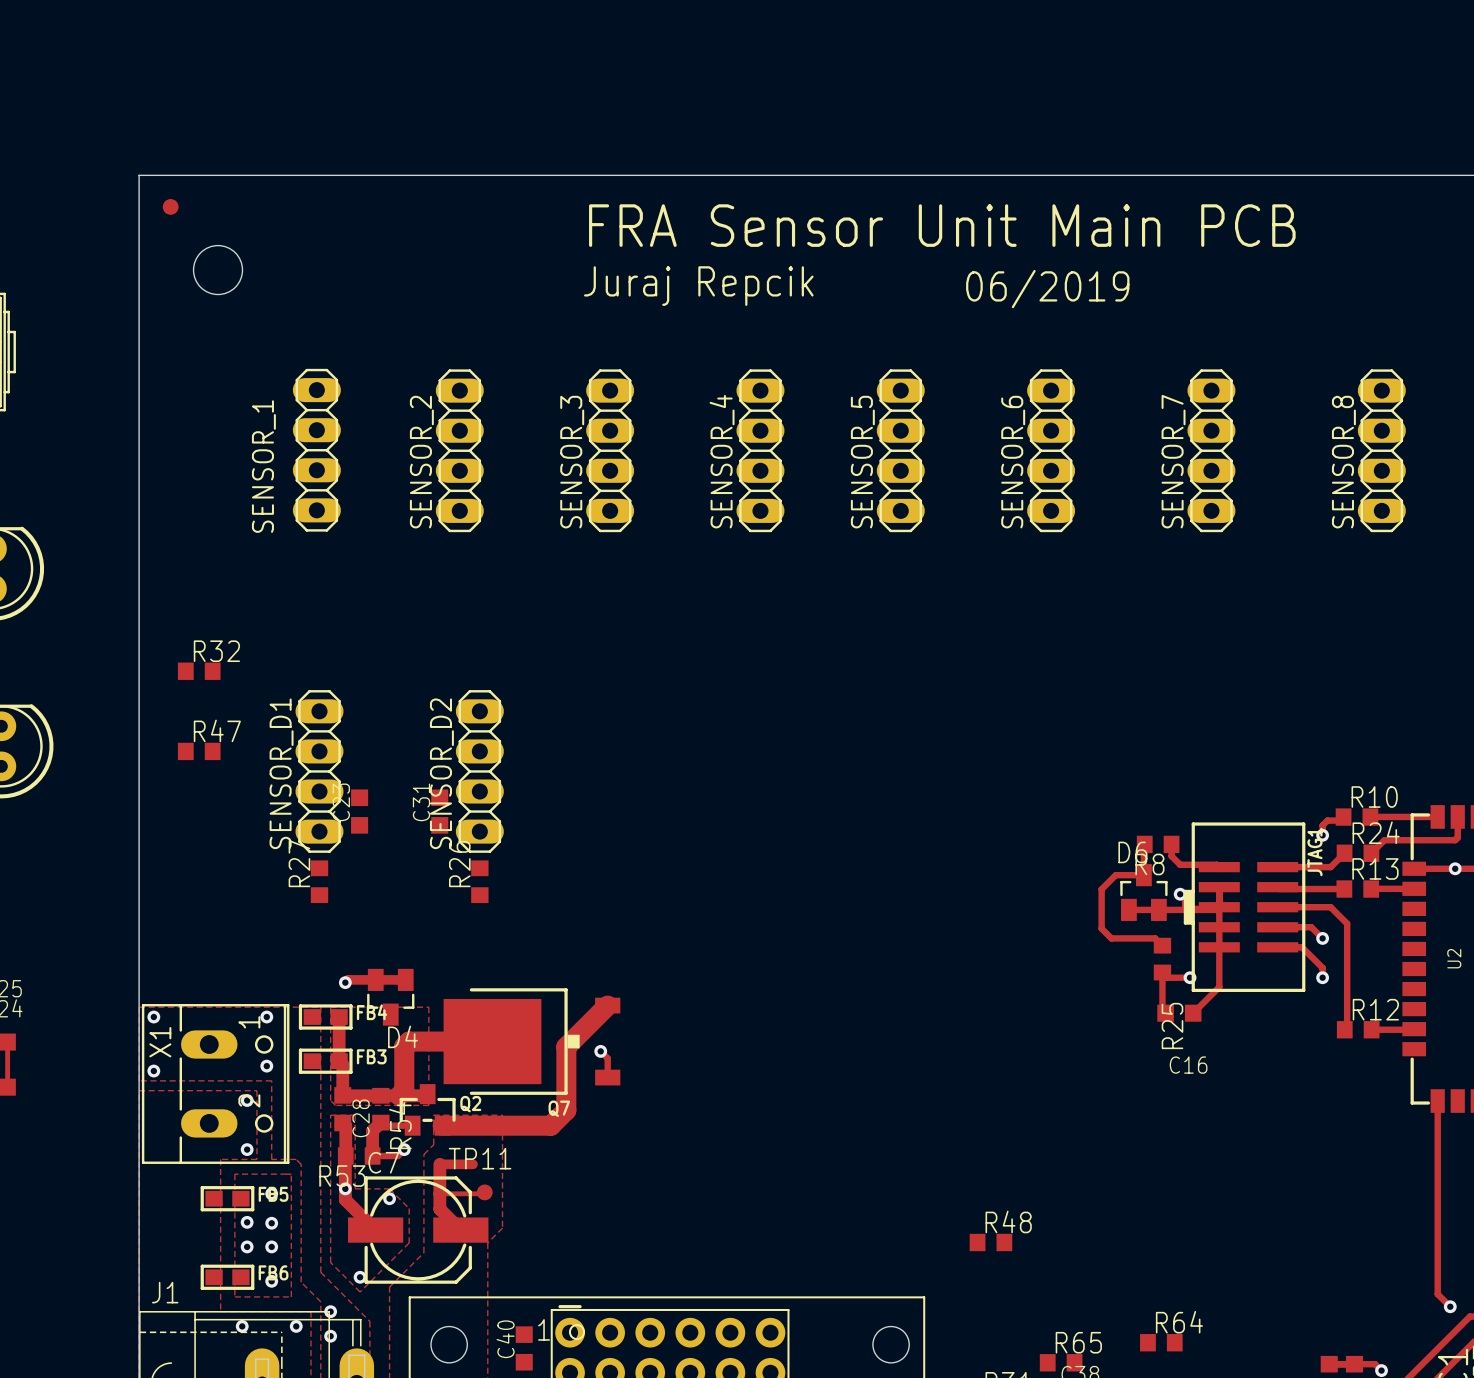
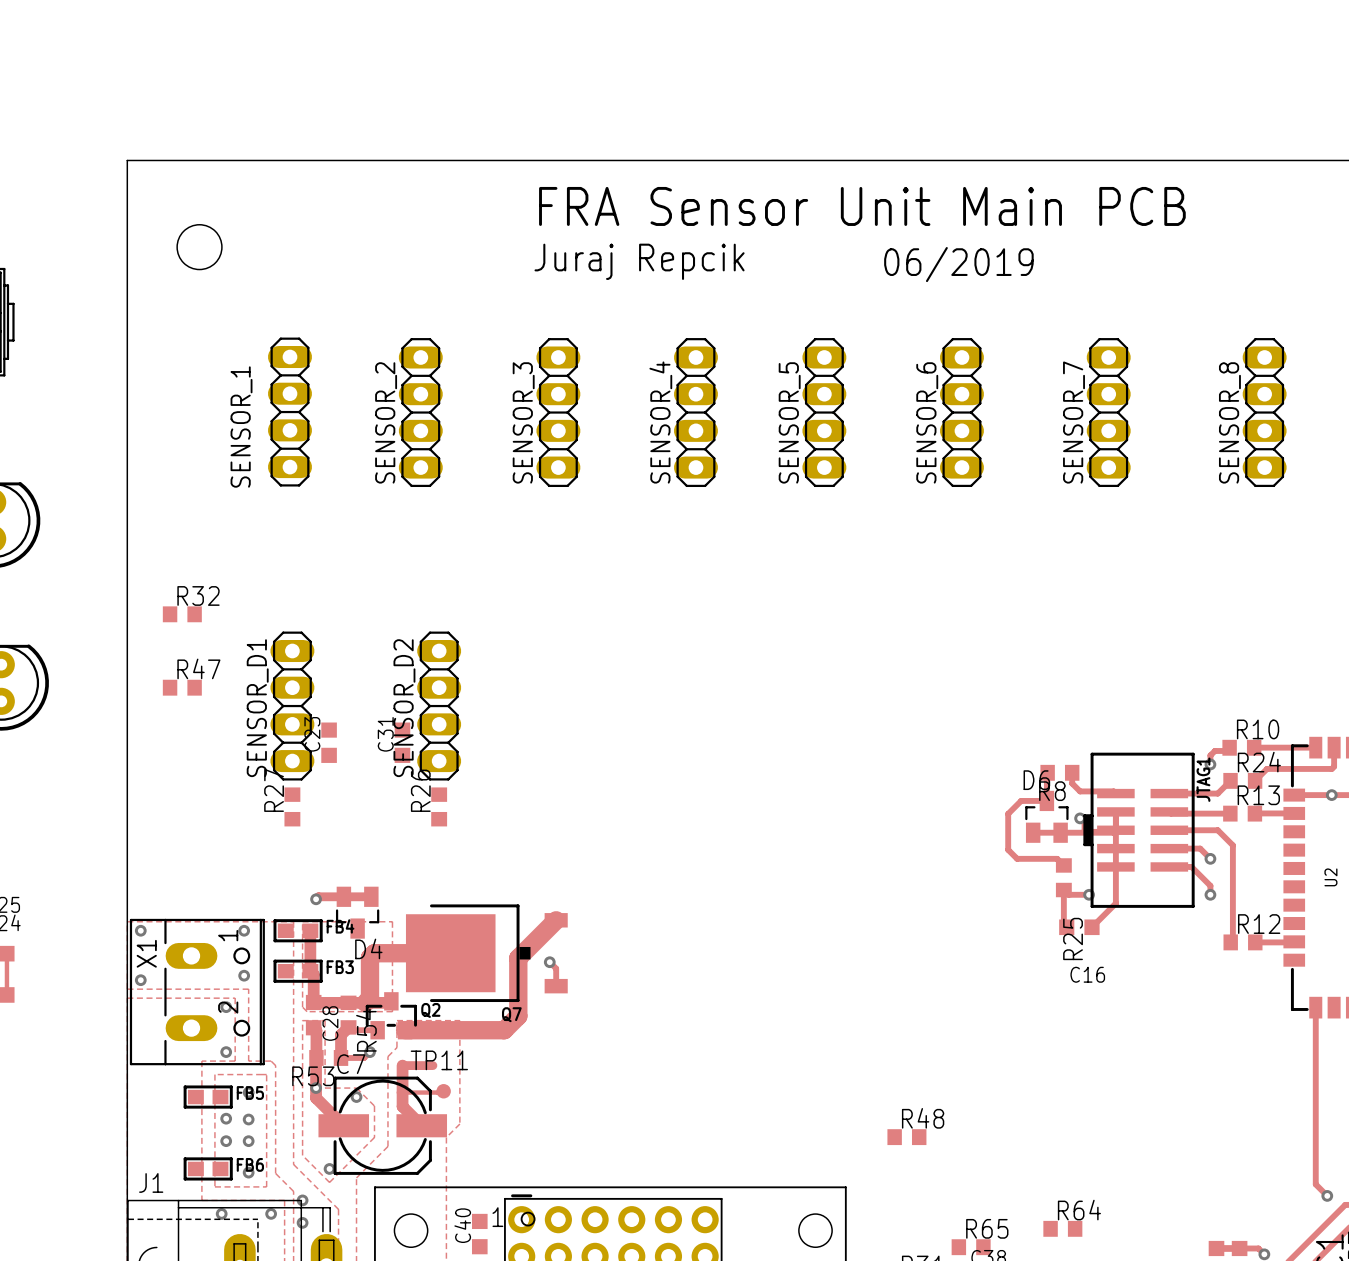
part: (170, 206) -> none

